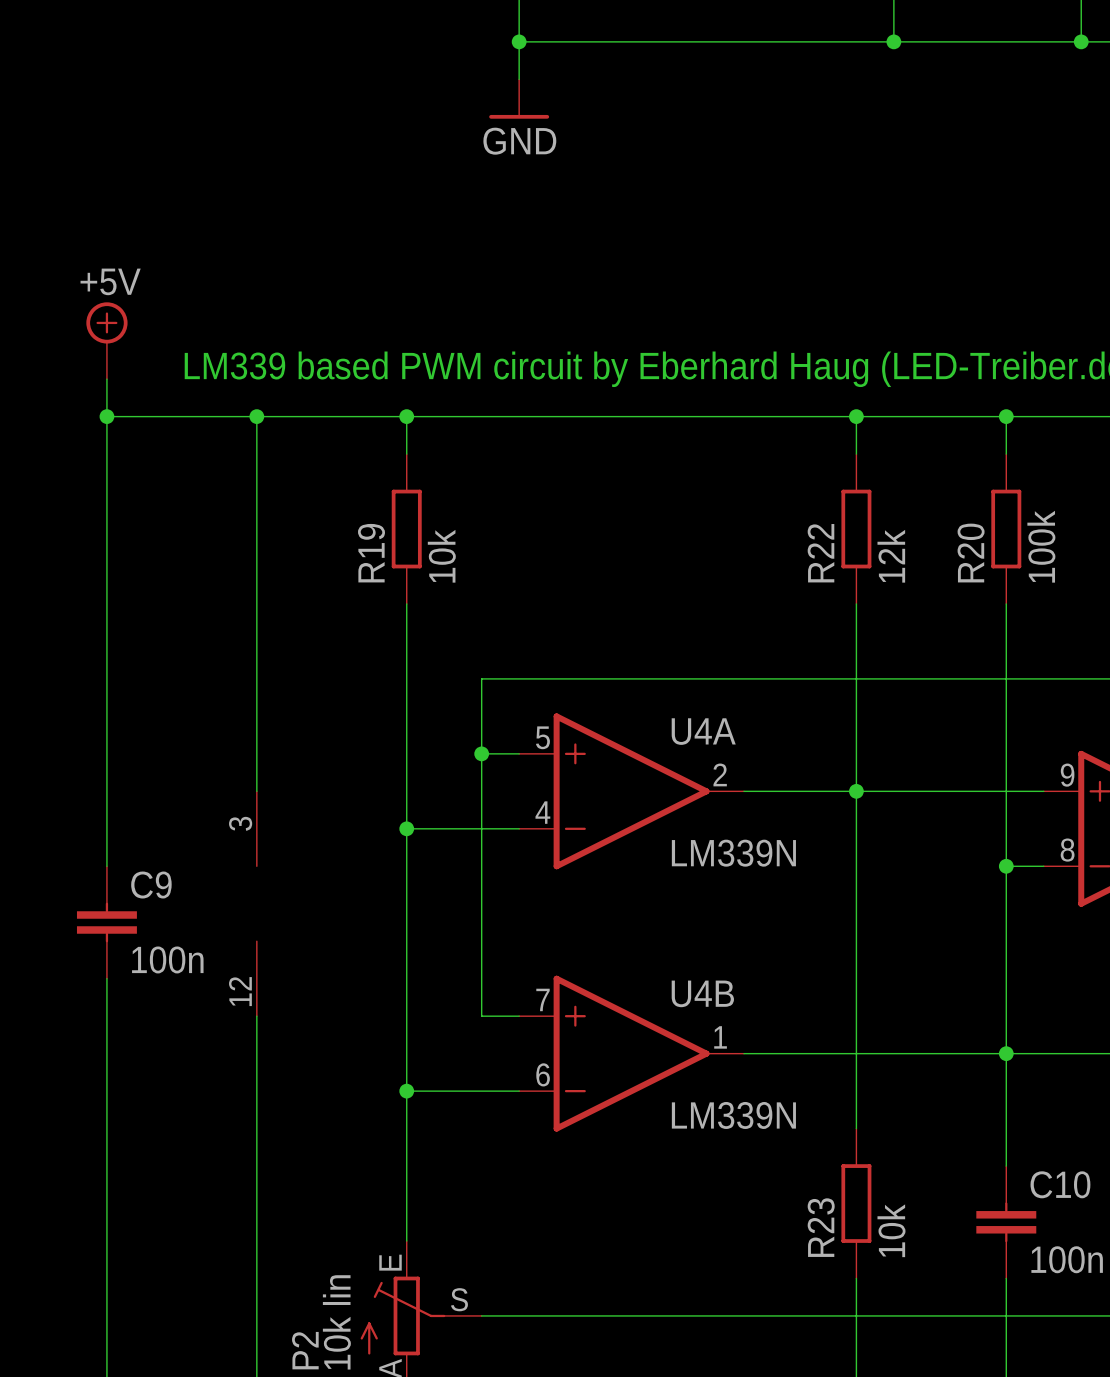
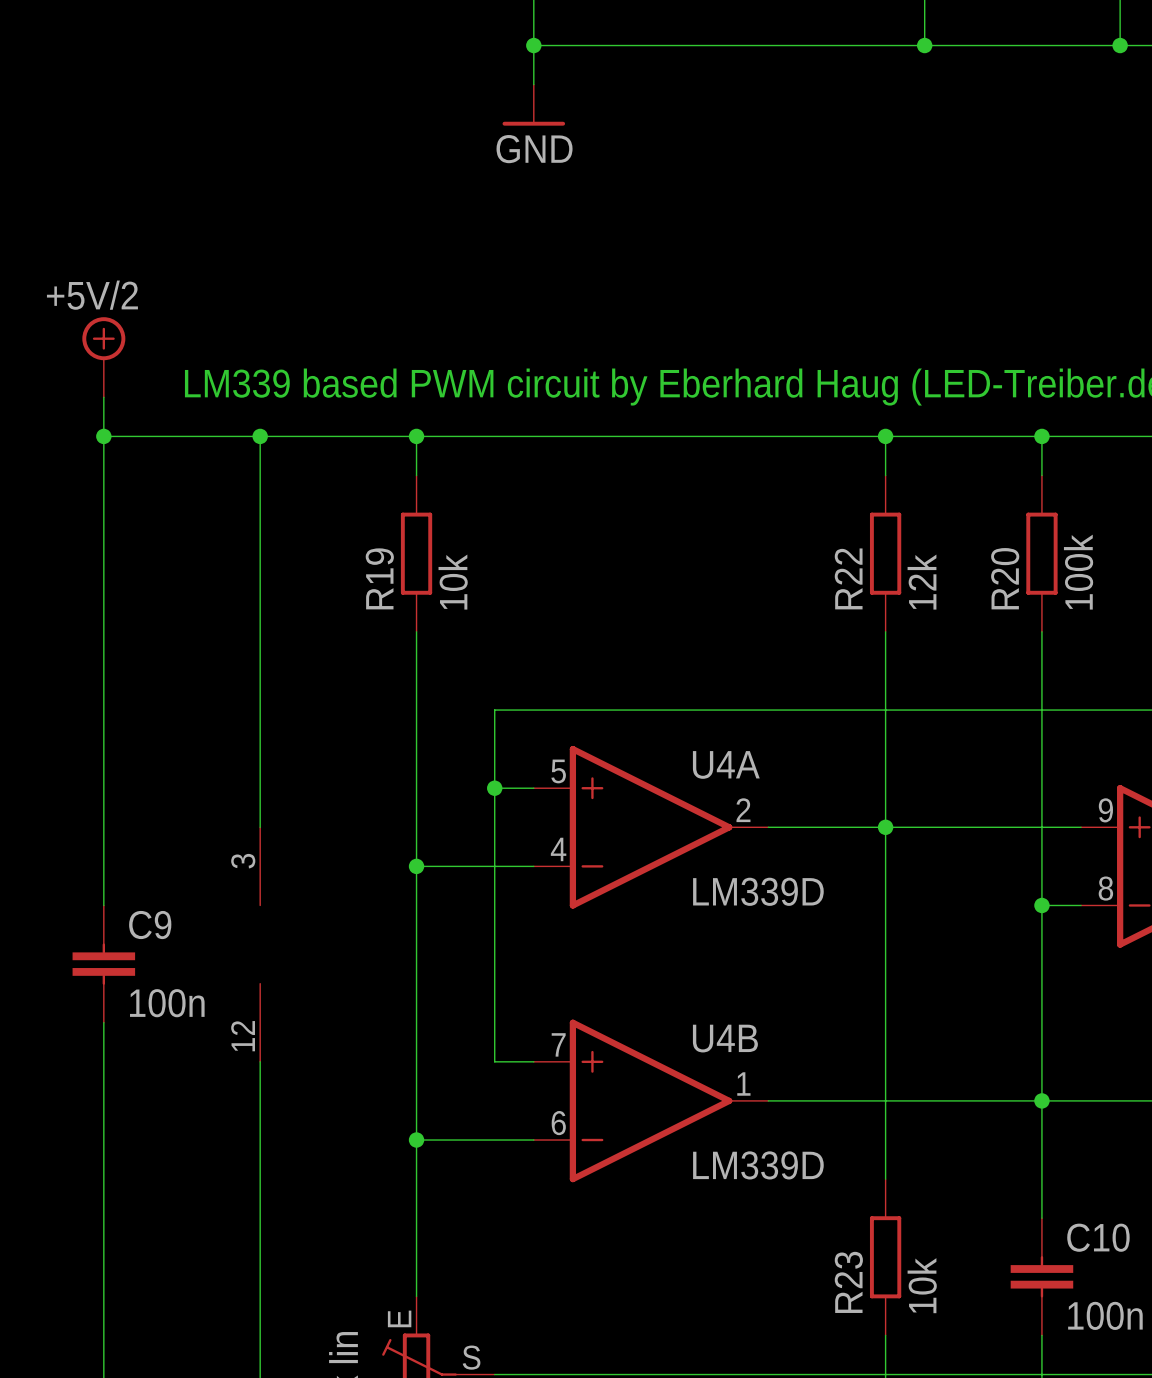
power symbol: +5V (106, 340) -> +5V/2 (103, 357)
U4A value: LM339N (733, 853) -> LM339D (758, 891)
U4B value: LM339N (733, 1115) -> LM339D (758, 1165)

